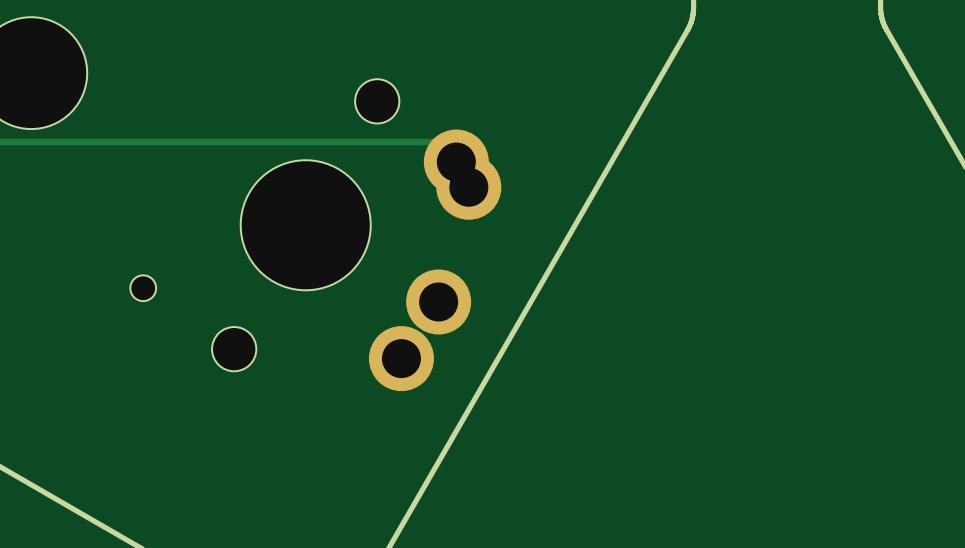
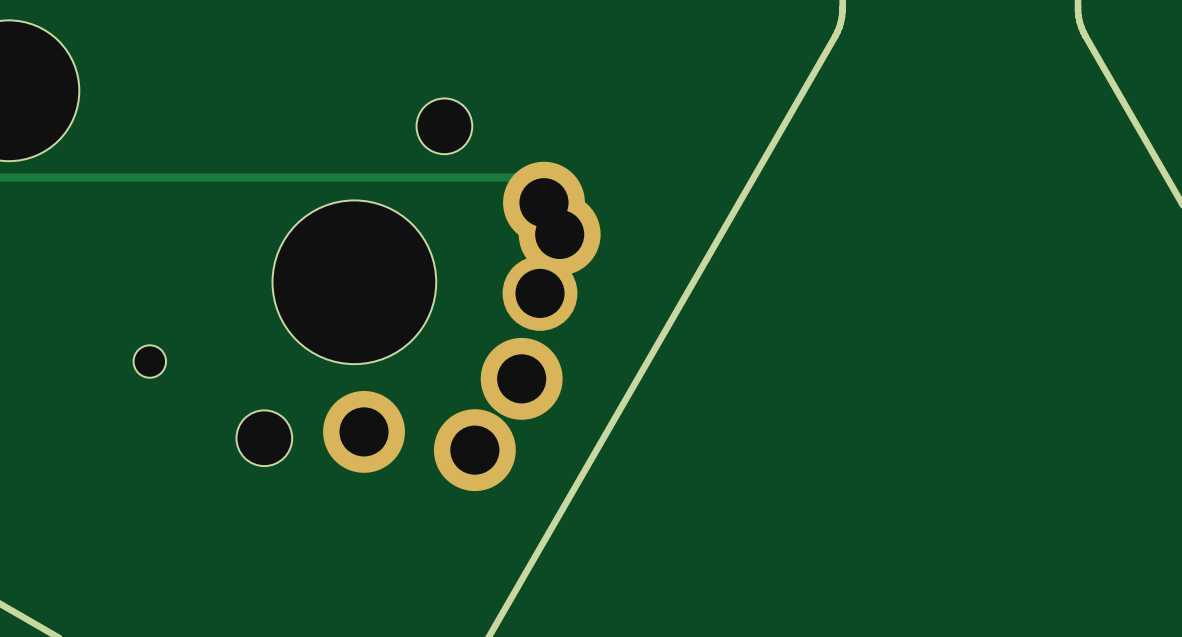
part footprint: [130, 79, 502, 392] -> [133, 98, 601, 492]

